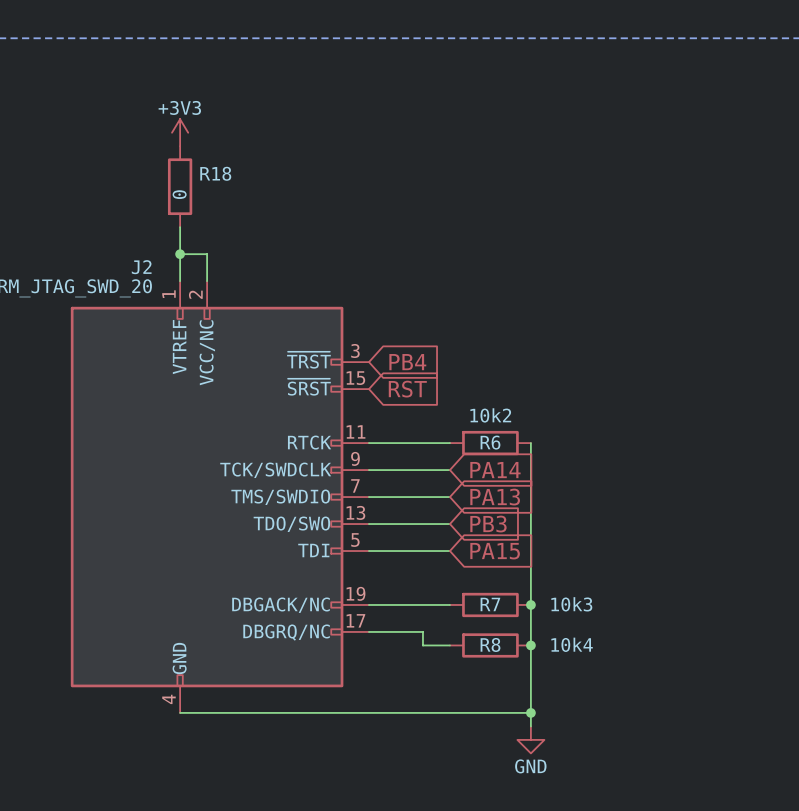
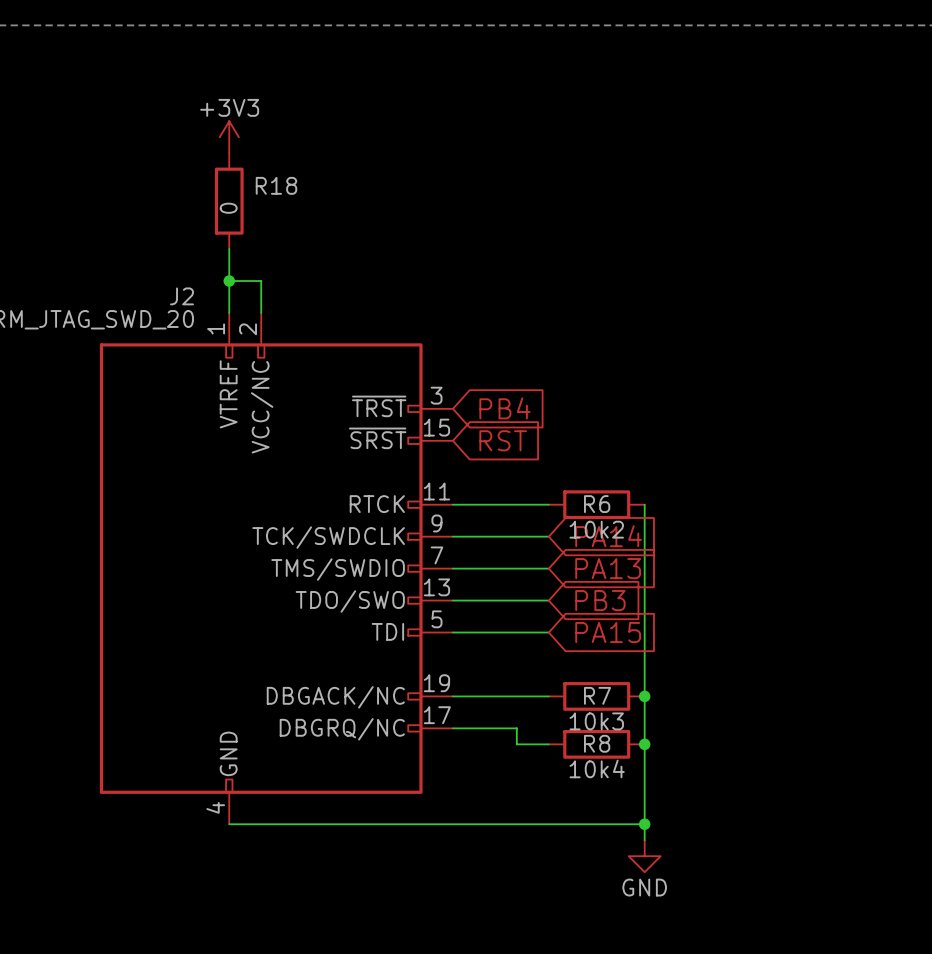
10k2 name position: 10k2 (490, 415) -> 10k2 (596, 529)
10k3 name position: 10k3 (571, 604) -> 10k3 (596, 721)
10k4 name position: 10k4 (572, 644) -> 10k4 (597, 768)

